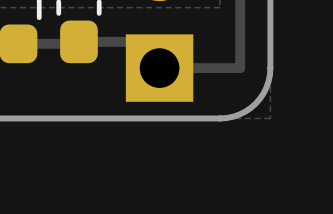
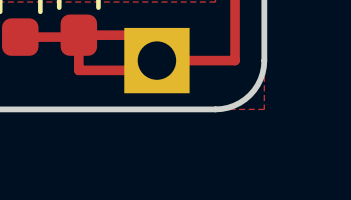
track: none -> (78, 35) (78, 70) (147, 70) (156, 60)

